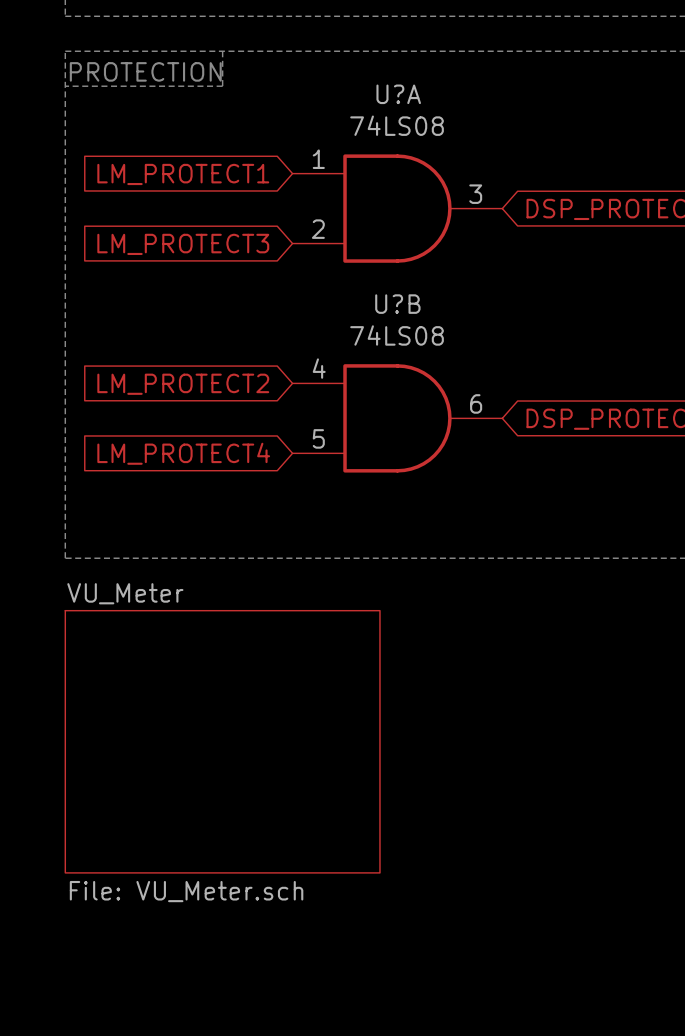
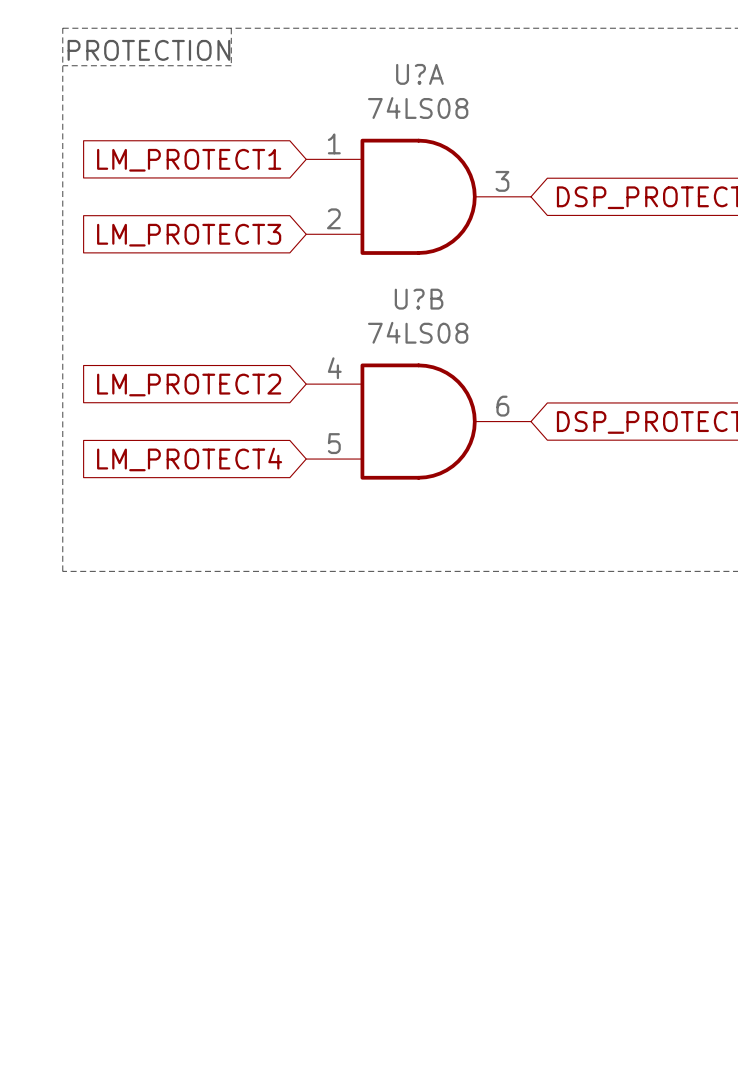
sheet VU_Meter: File: VU_Meter.sch (222, 741) -> none

